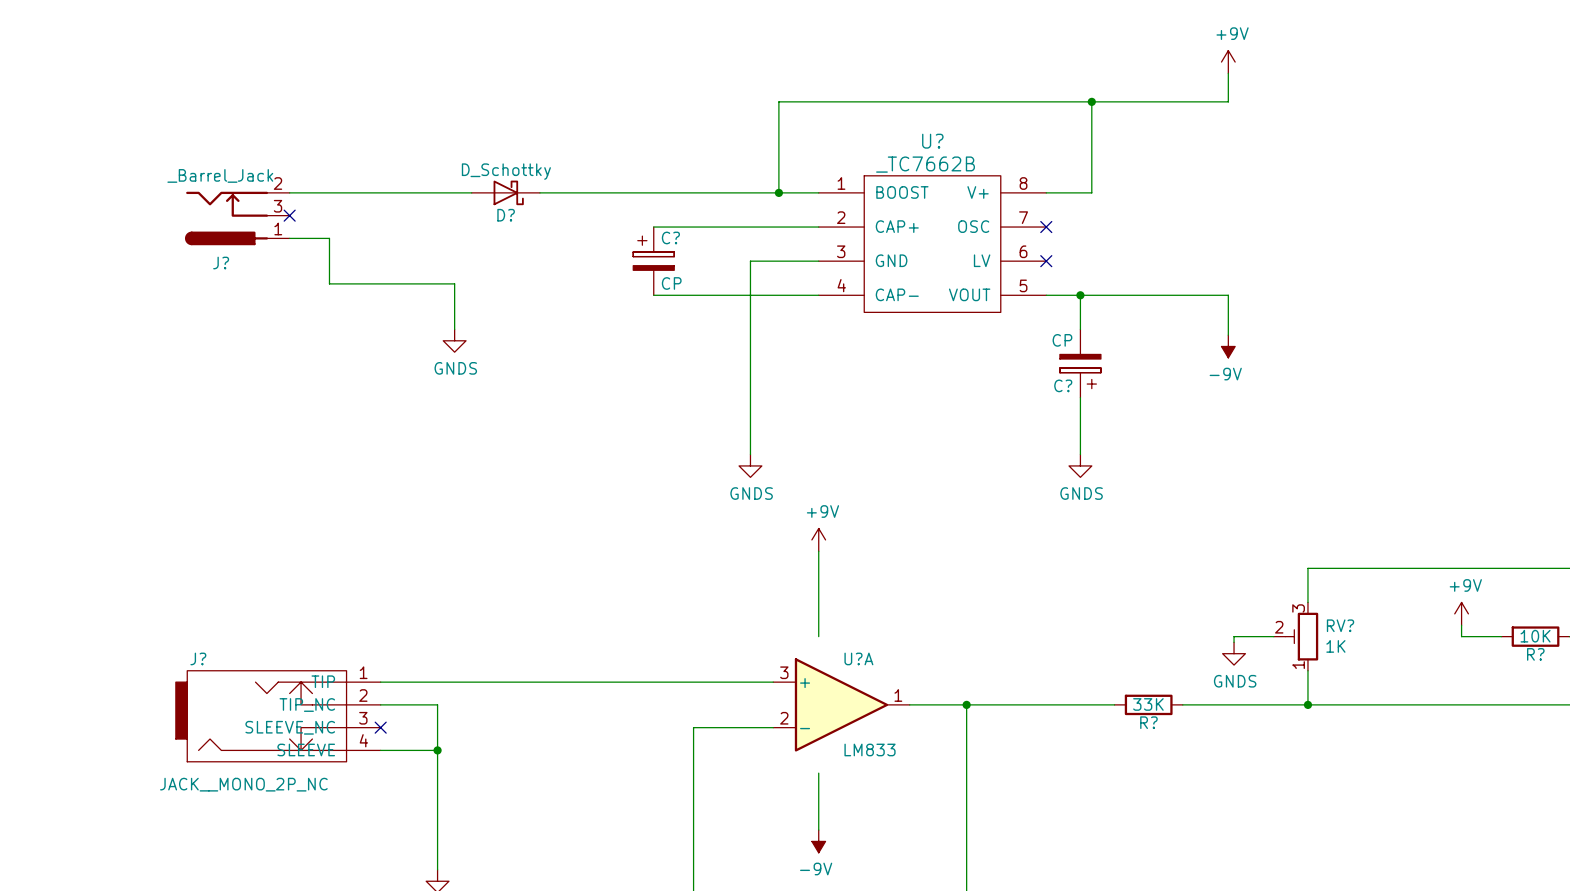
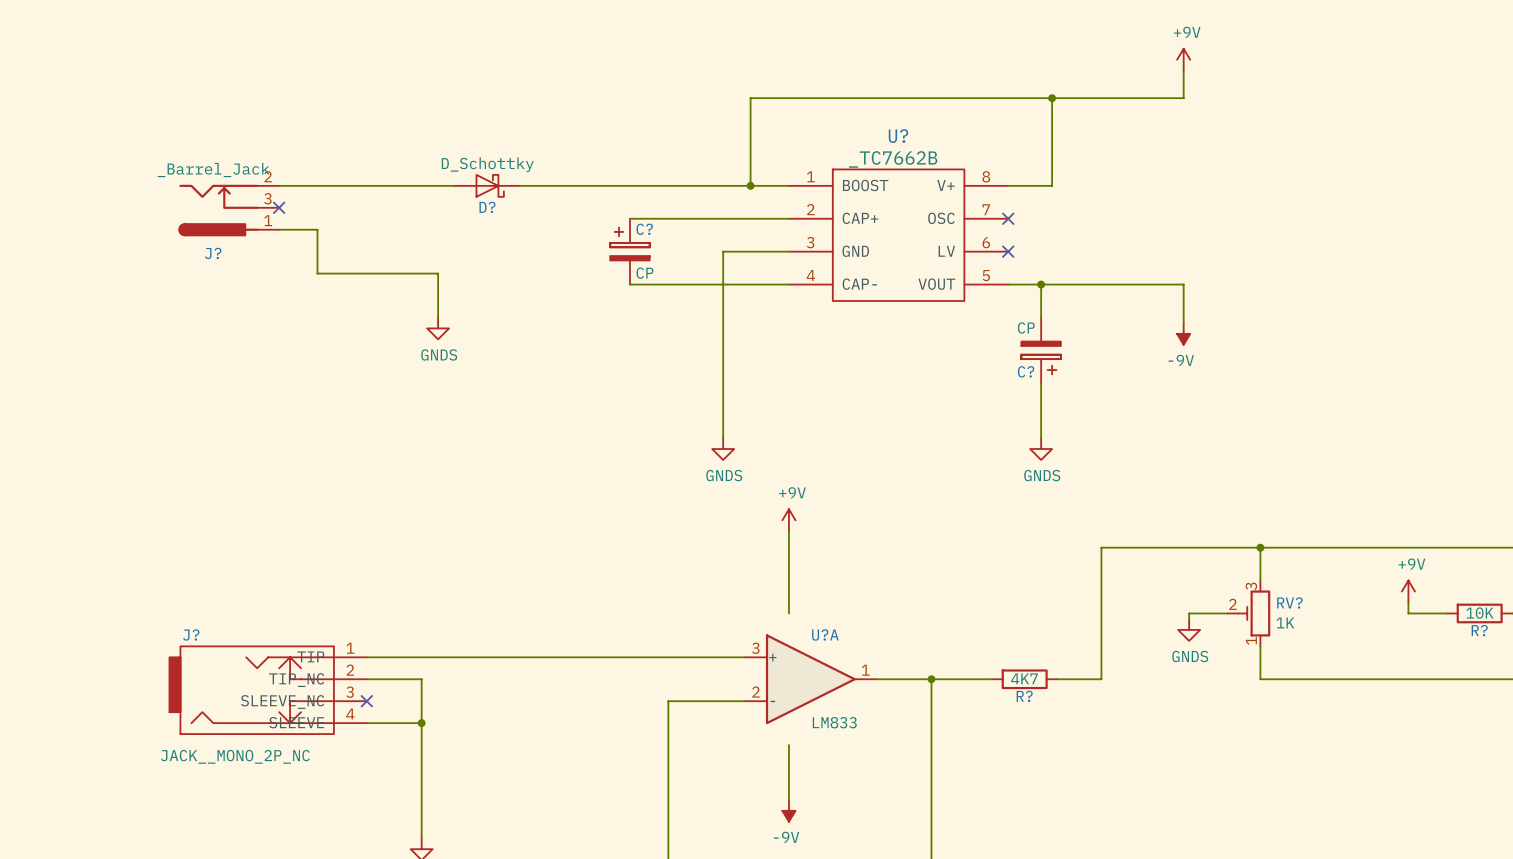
wire: none -> (1260, 547) (1101, 547) (1101, 679) (1074, 679)
junction: none -> (1260, 547)
wire: (1029, 704) (1097, 704) -> none
R?: none -> 4K7 (1024, 679)
R?: 33K (1148, 704) -> none
wire: (1182, 704) (1307, 704) -> none
junction: (1307, 704) -> none

